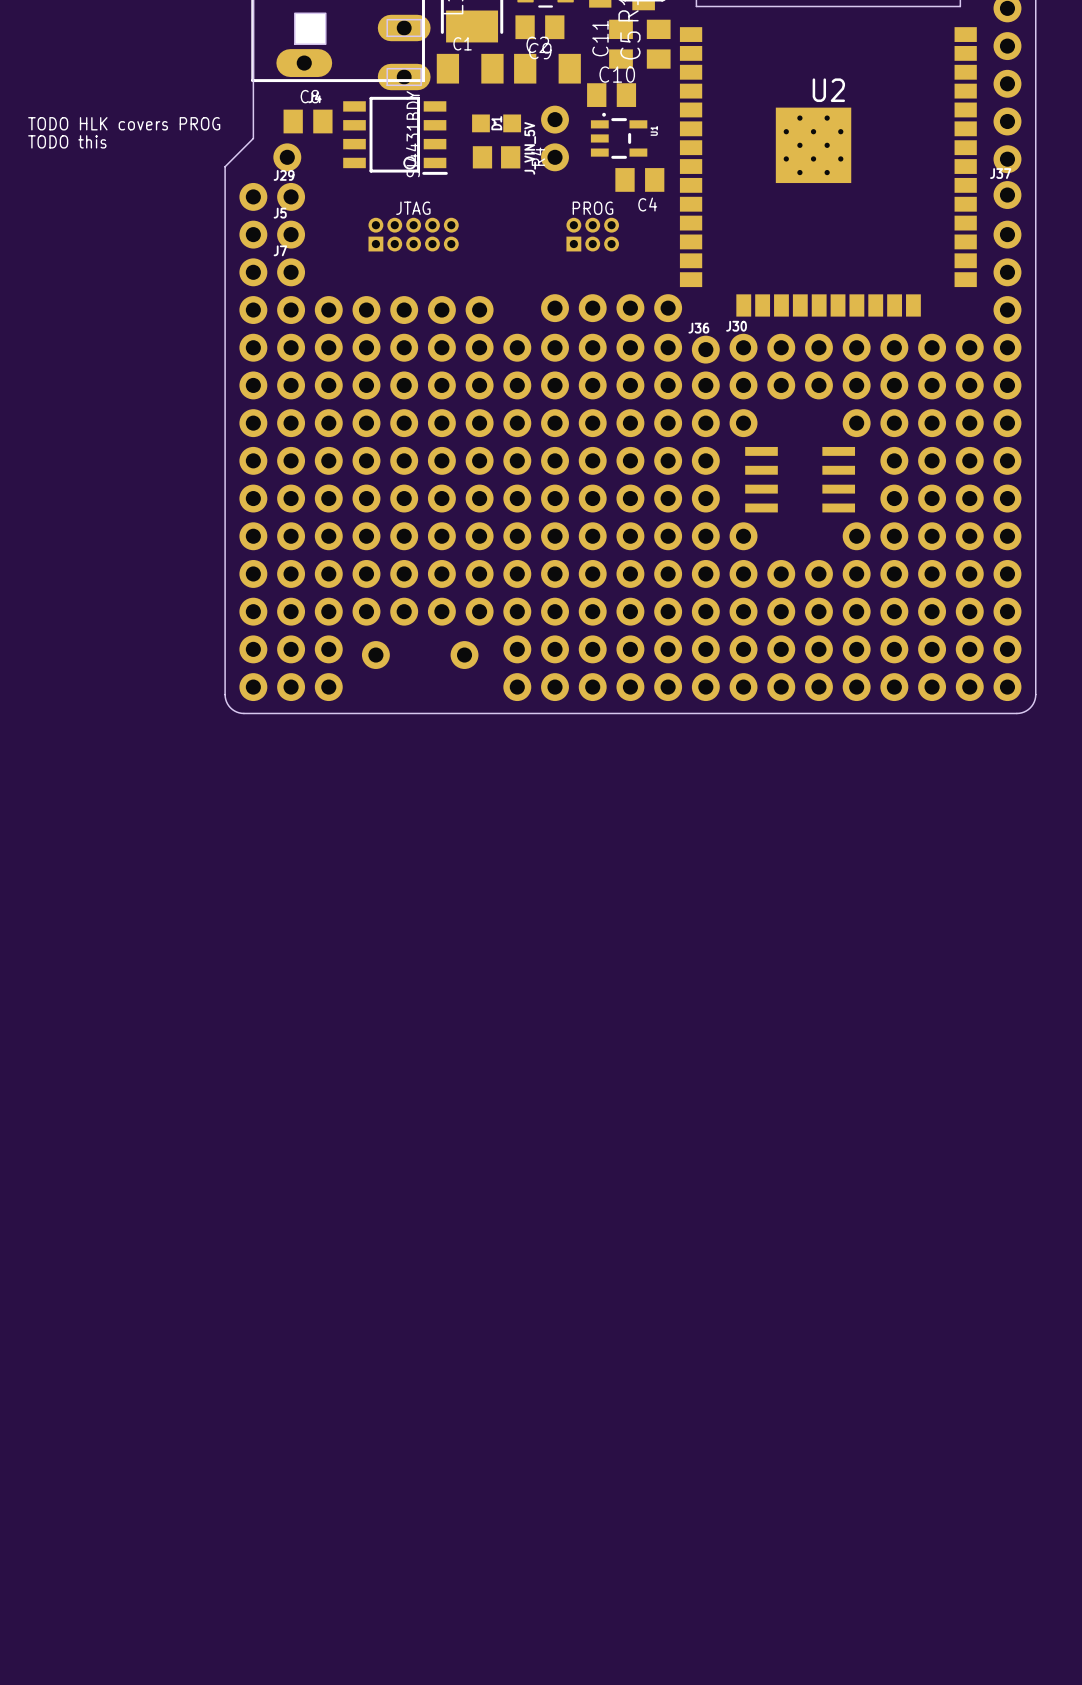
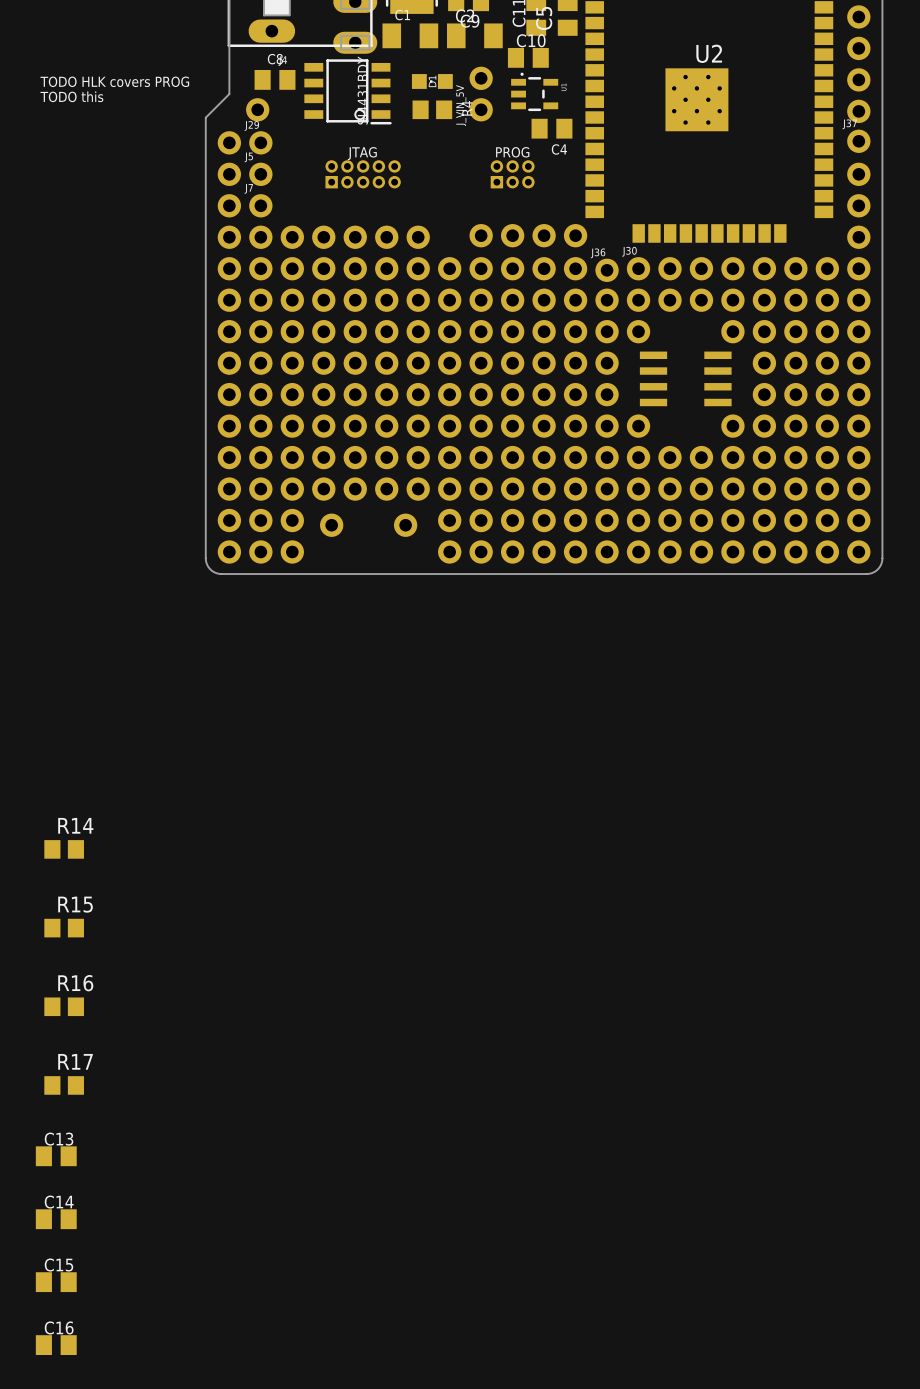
R14: none -> (64, 849)
R15: none -> (64, 928)
R16: none -> (64, 1006)
R17: none -> (64, 1085)
C13: none -> (56, 1156)
C14: none -> (56, 1219)
C15: none -> (56, 1282)
C16: none -> (56, 1345)

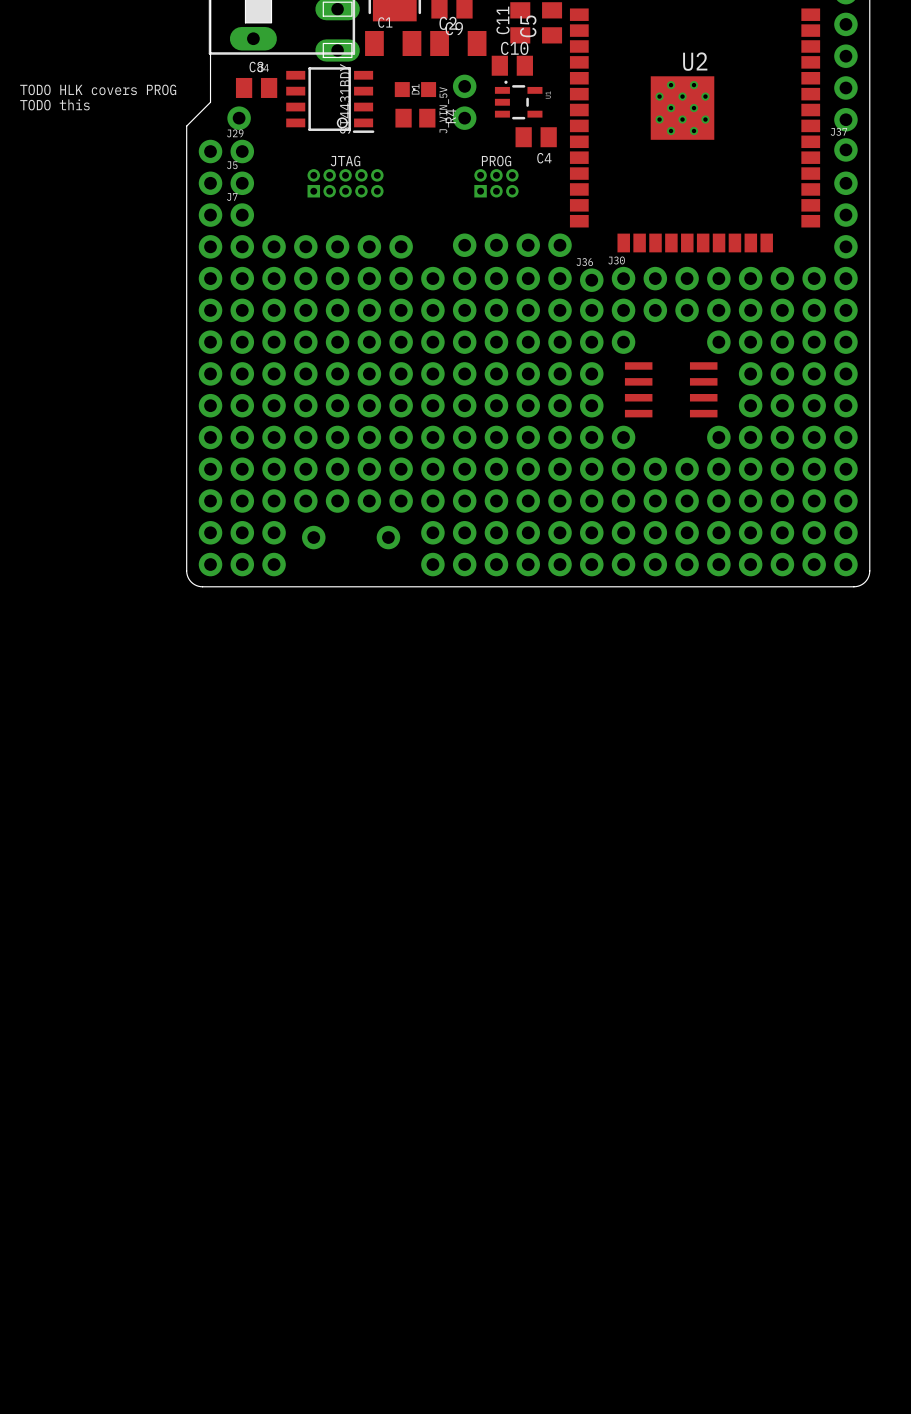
R14: (64, 849) -> none
R15: (64, 928) -> none
R16: (64, 1006) -> none
R17: (64, 1085) -> none
C13: (56, 1156) -> none
C14: (56, 1219) -> none
C15: (56, 1282) -> none
C16: (56, 1345) -> none

